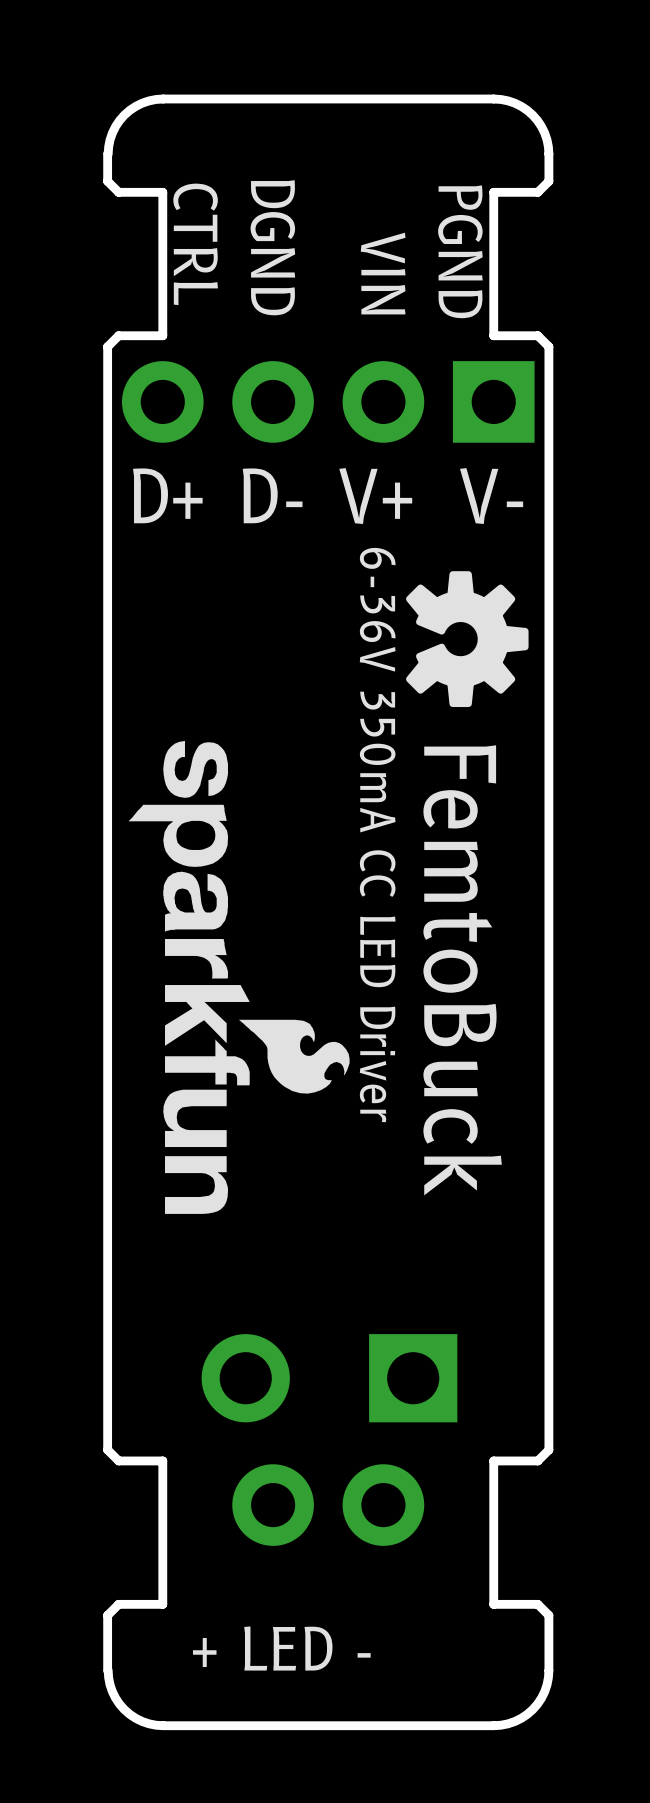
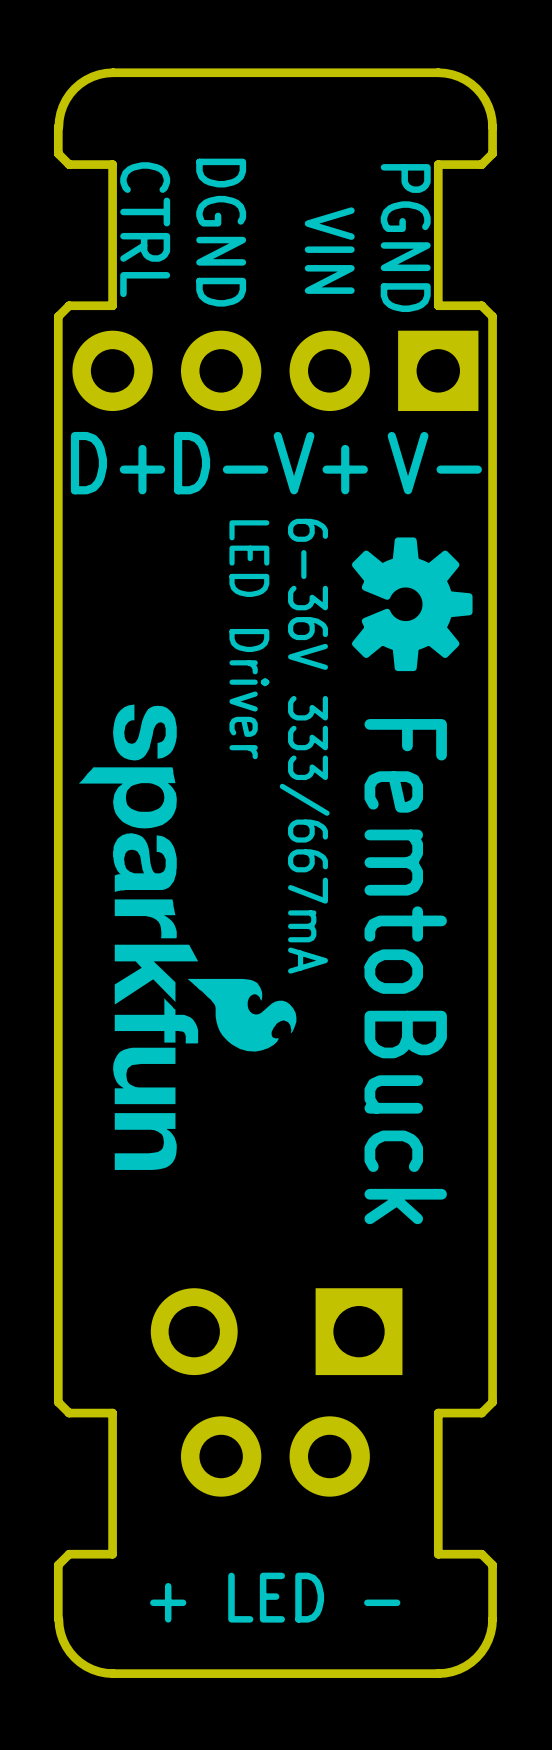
text: none -> LED Driver (249, 639)
text: 6-36V 350mA CC LED Driver (377, 835) -> 6-36V 333/667mA (304, 746)

